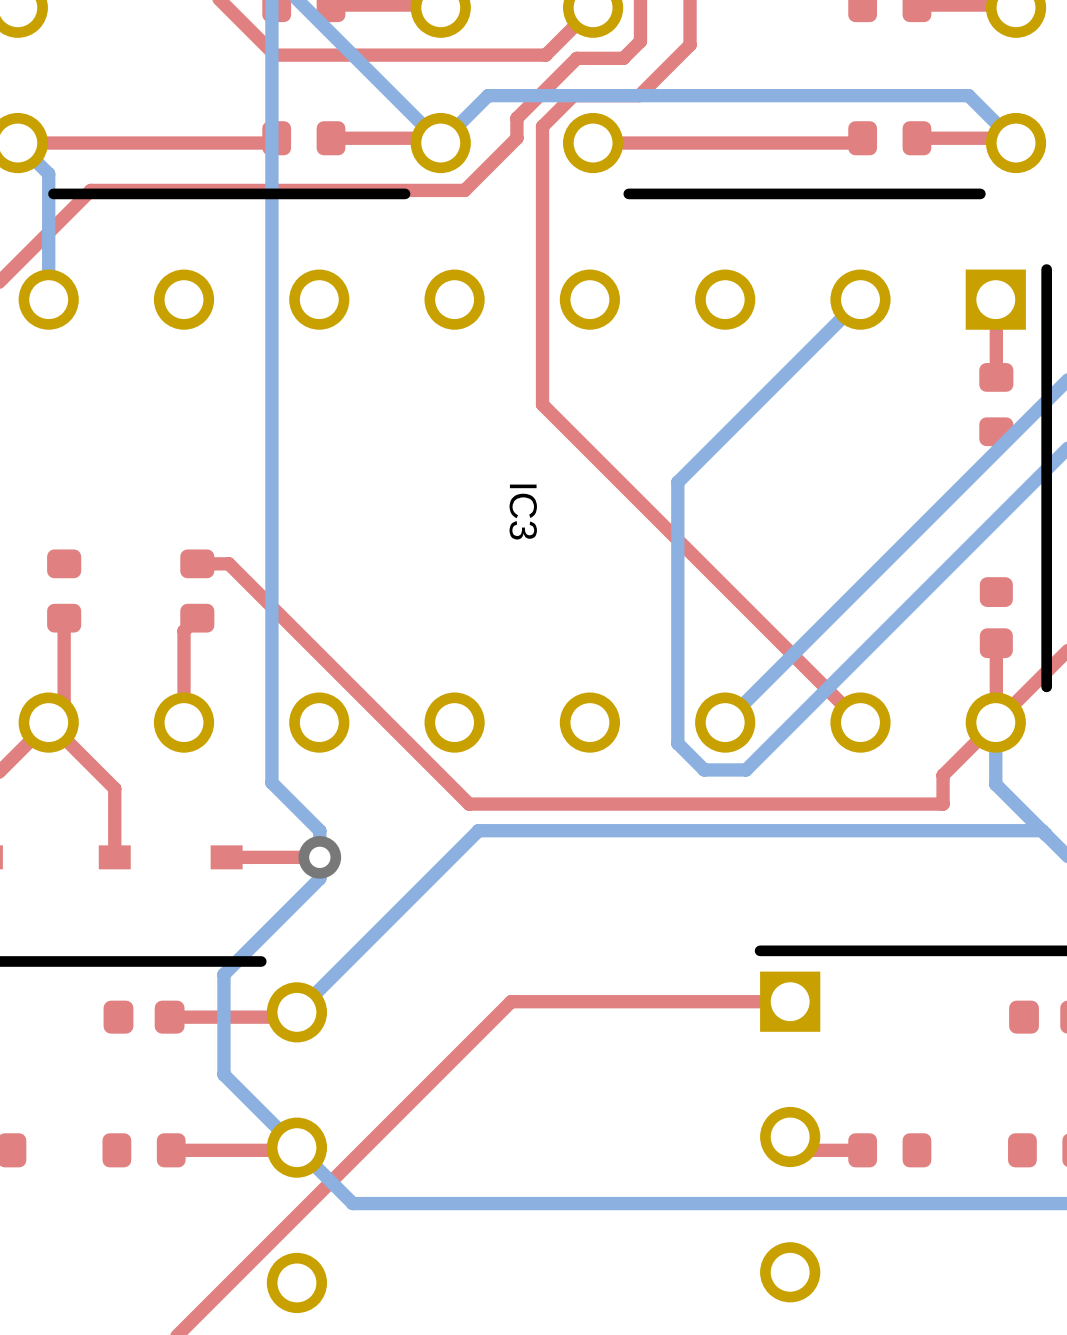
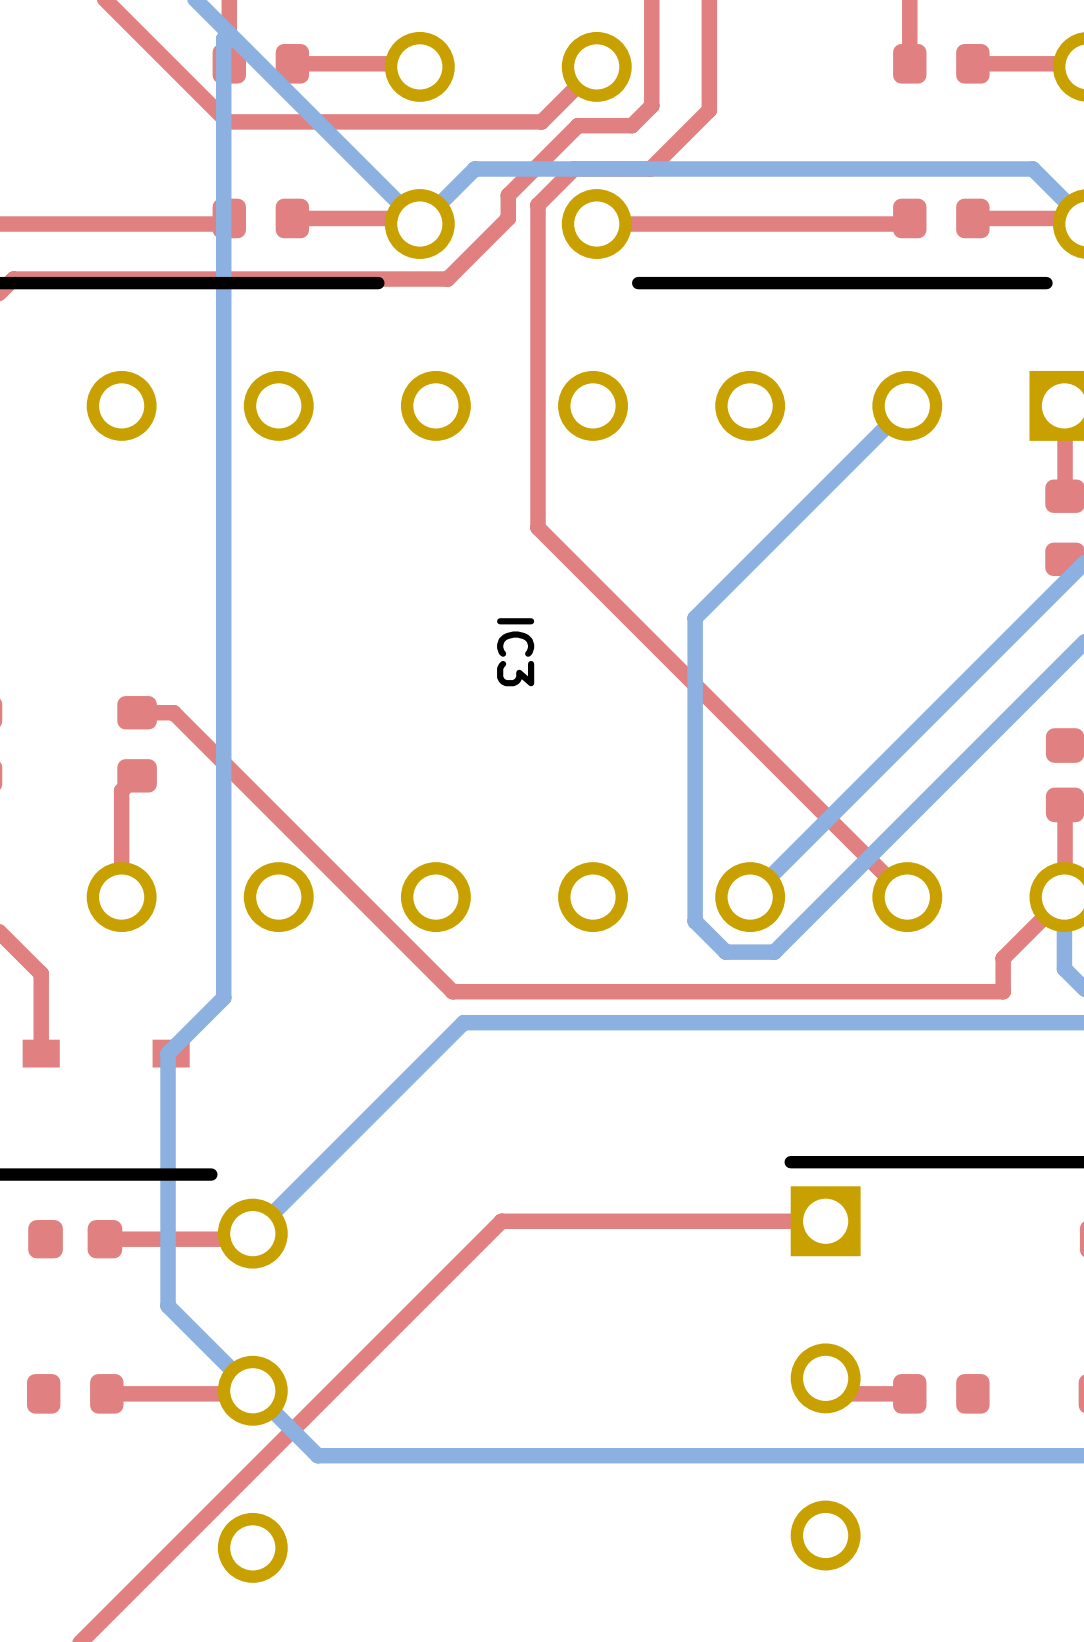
bottom track: (271, 782) (319, 830) (319, 878) (223, 974) -> (223, 967) (223, 997) (168, 1053) (168, 1189)
top track: (319, 857) (226, 857) -> none
via: (319, 857) -> none

